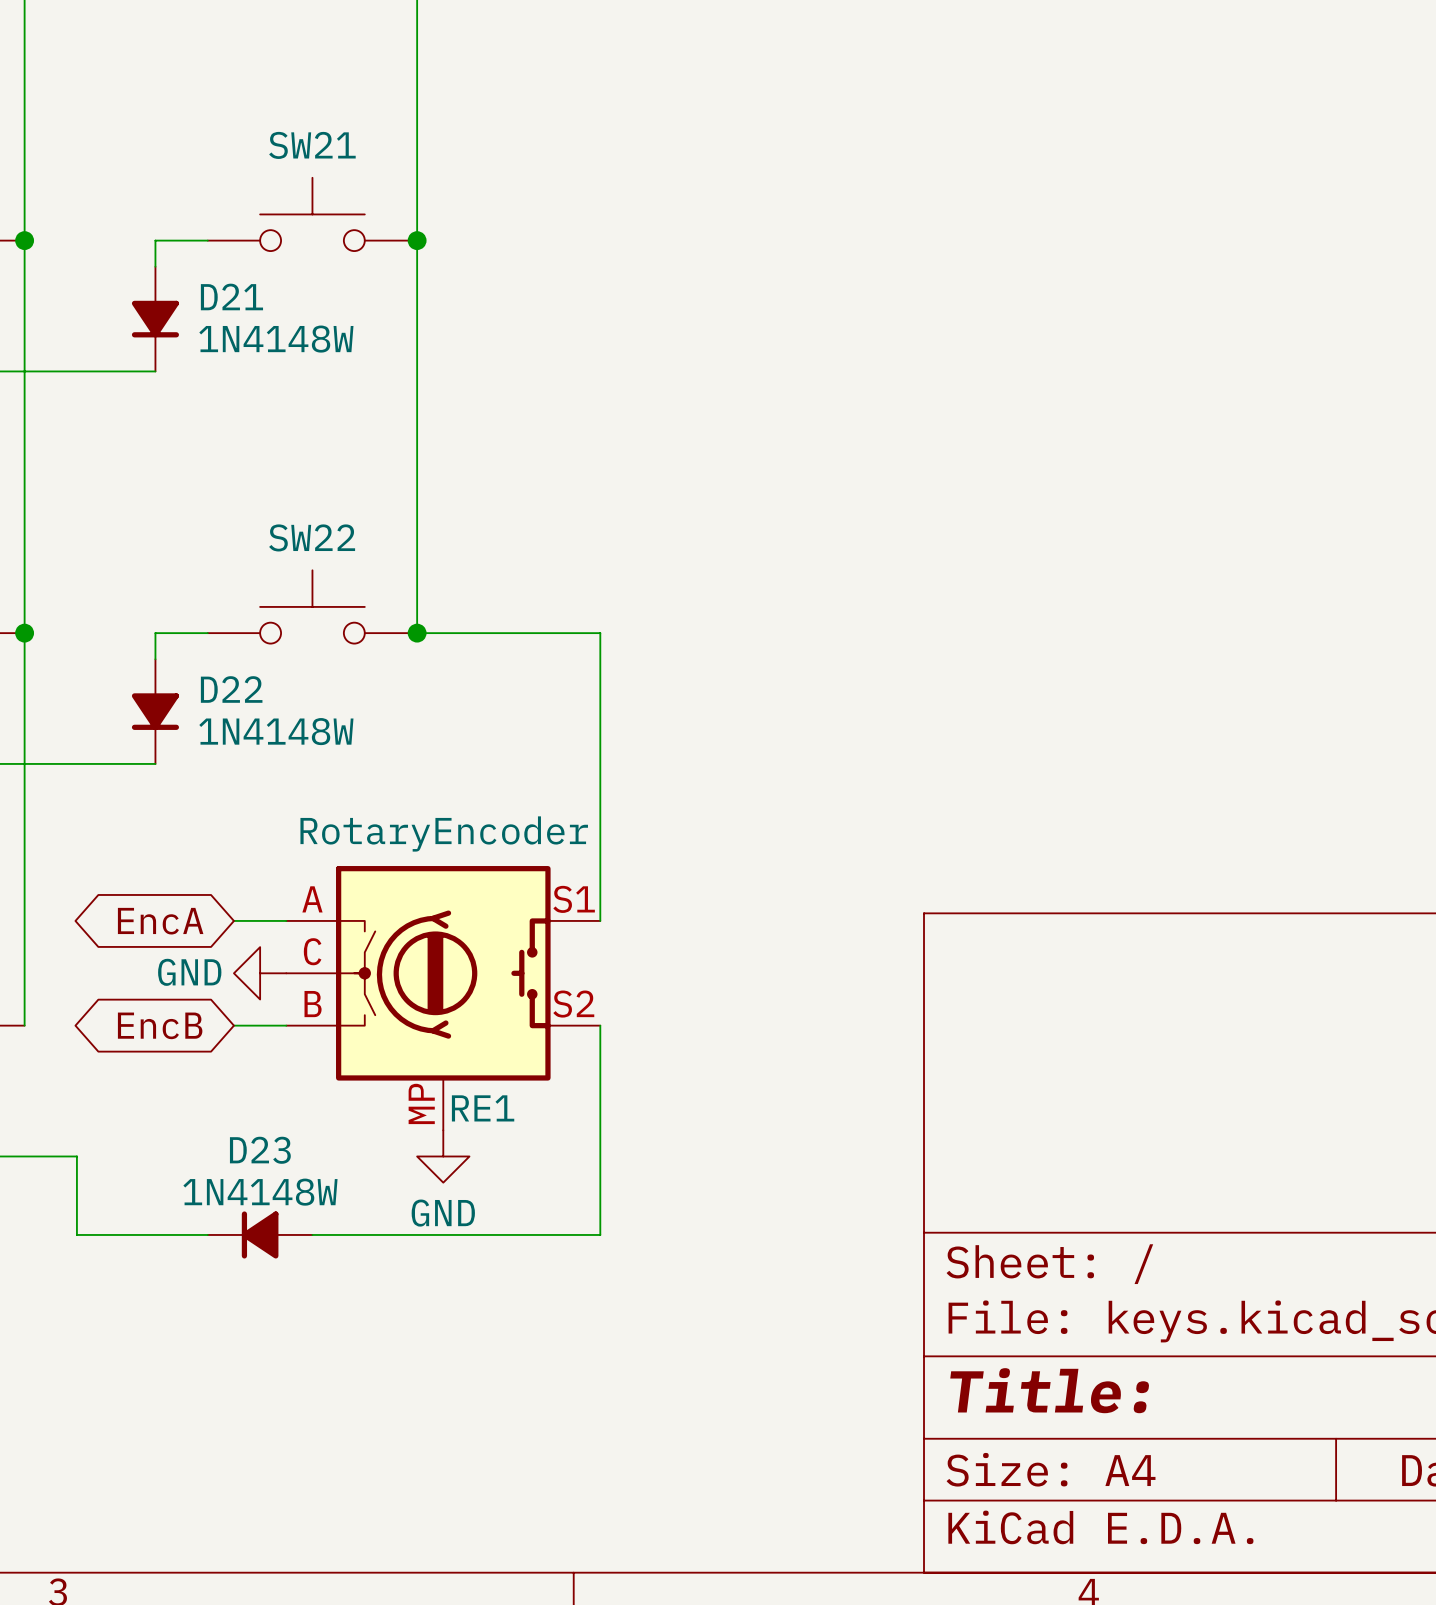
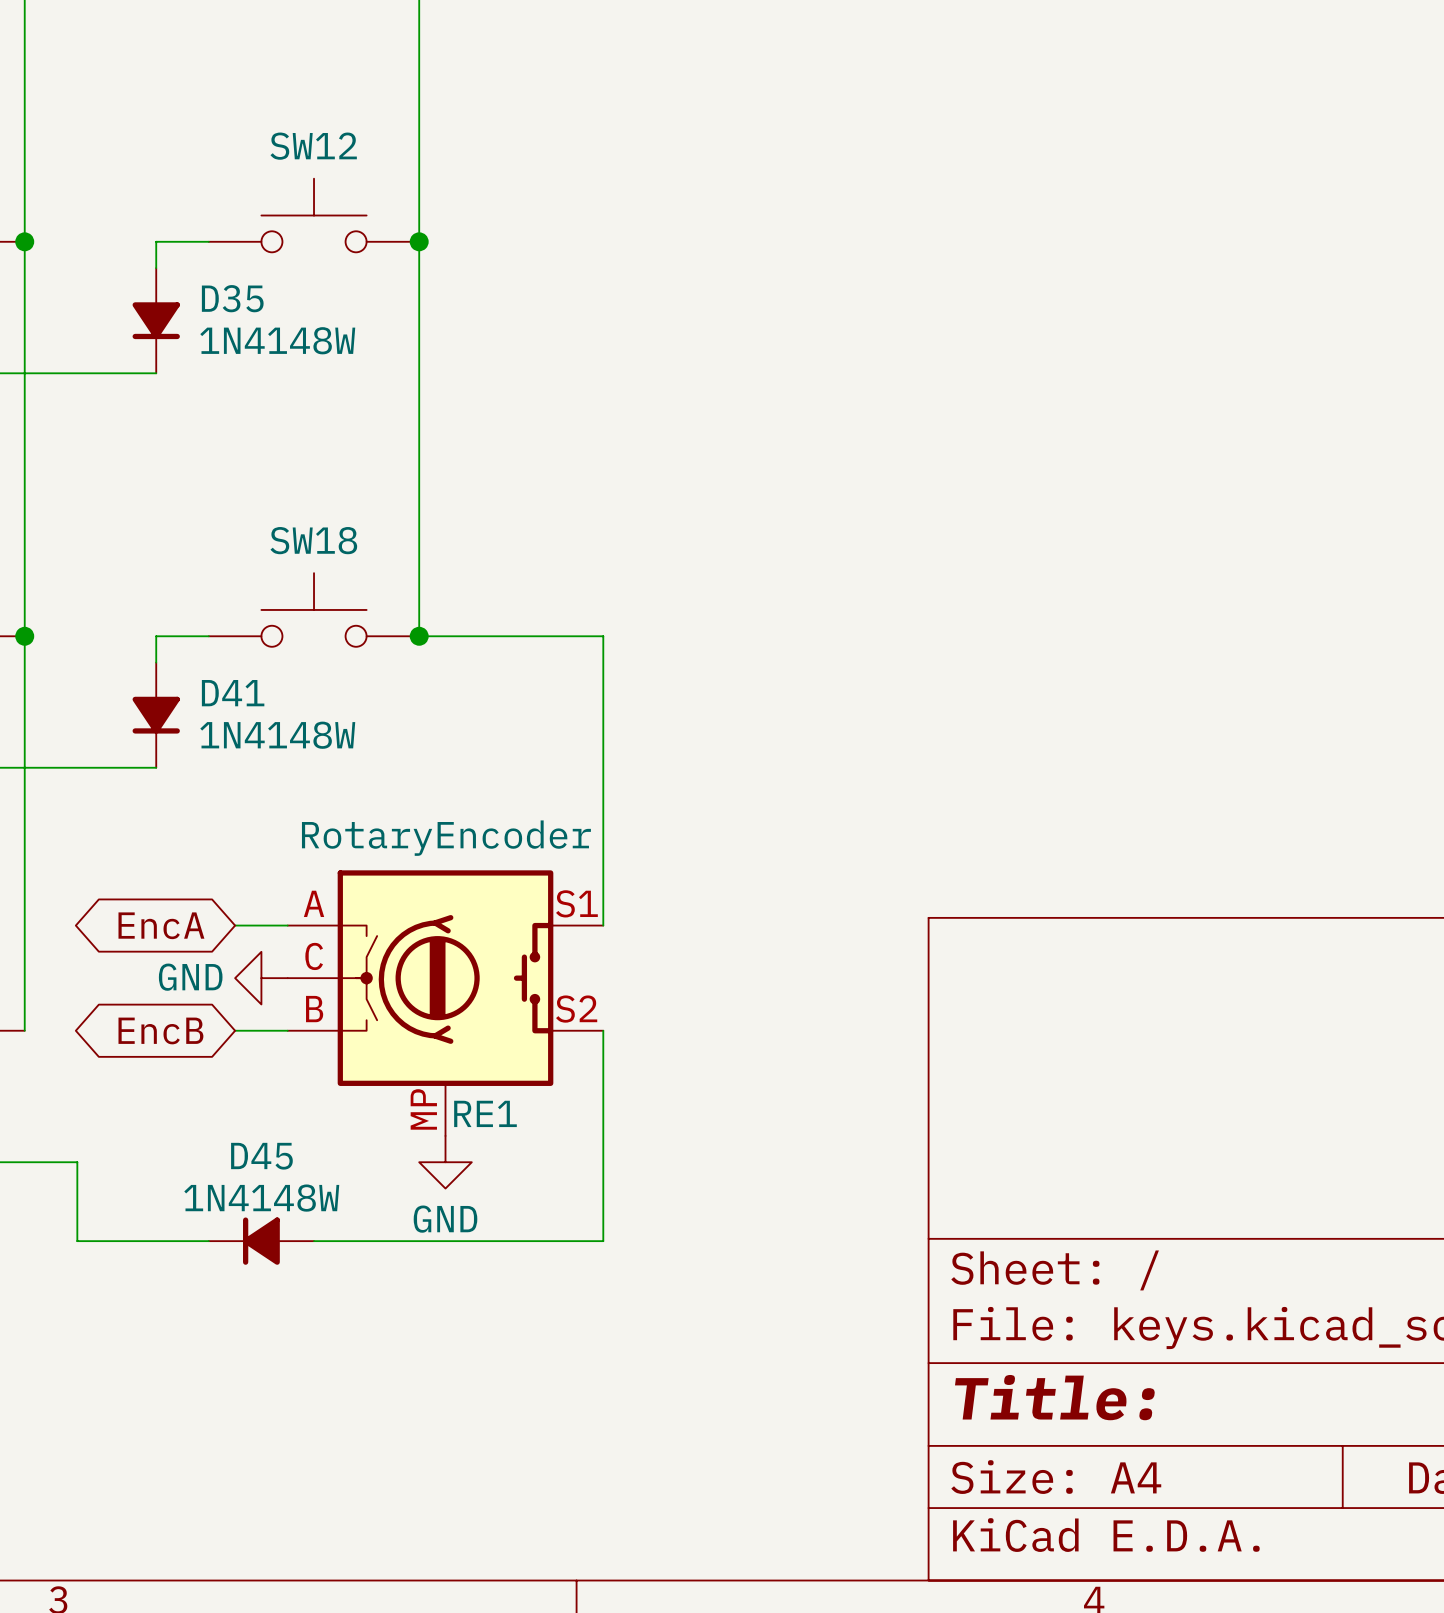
SW21 name: SW21 (312, 145) -> SW12 (313, 146)
D21 name: D21 (231, 296) -> D35 (232, 298)
SW22 name: SW22 (312, 537) -> SW18 (313, 540)
D22 name: D22 (231, 689) -> D41 (233, 693)
D23 name: D23 (260, 1150) -> D45 (261, 1156)

